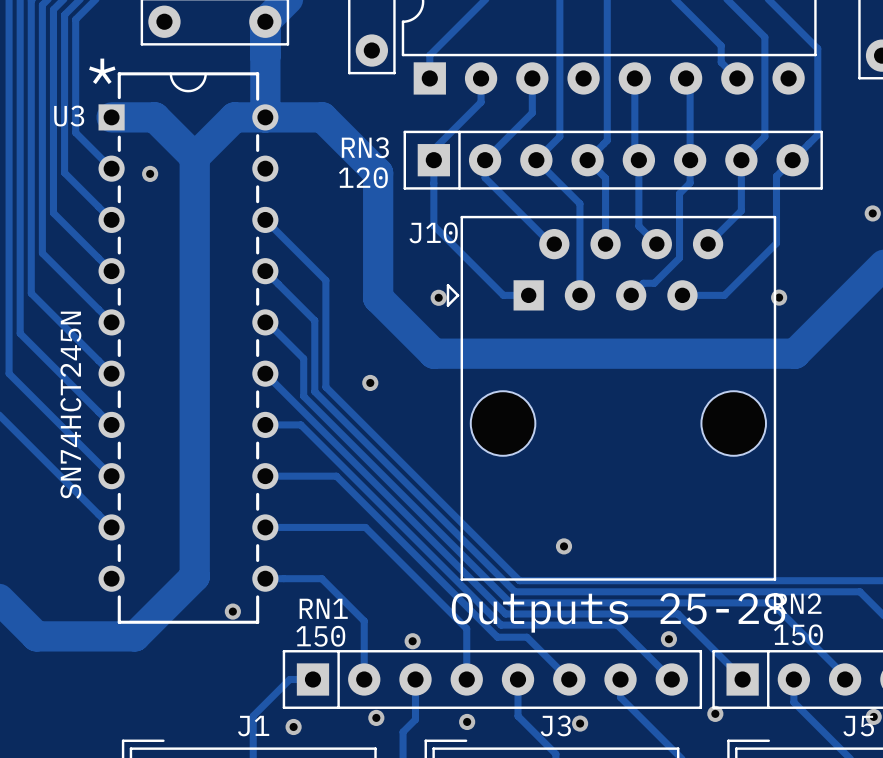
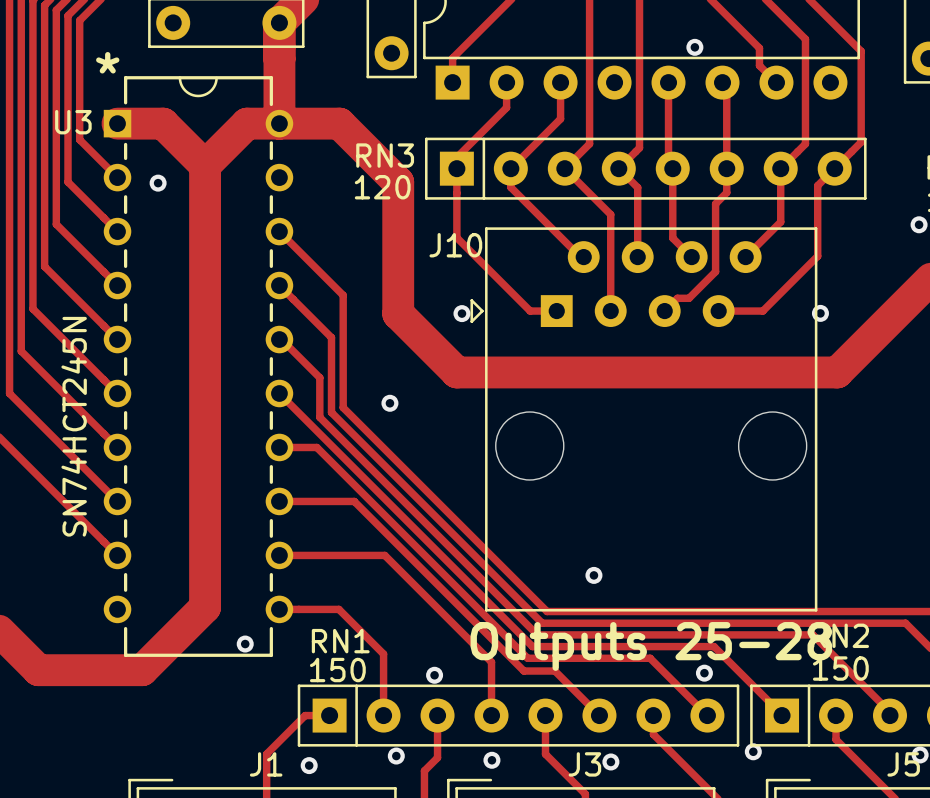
via: none -> (694, 47)

